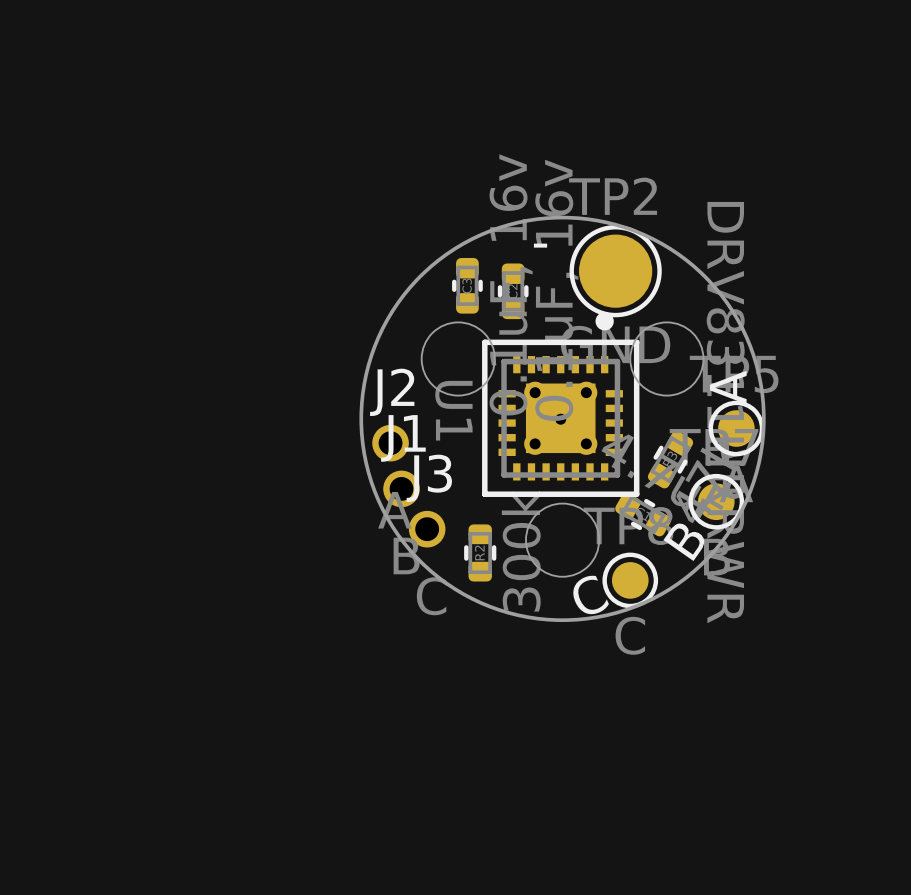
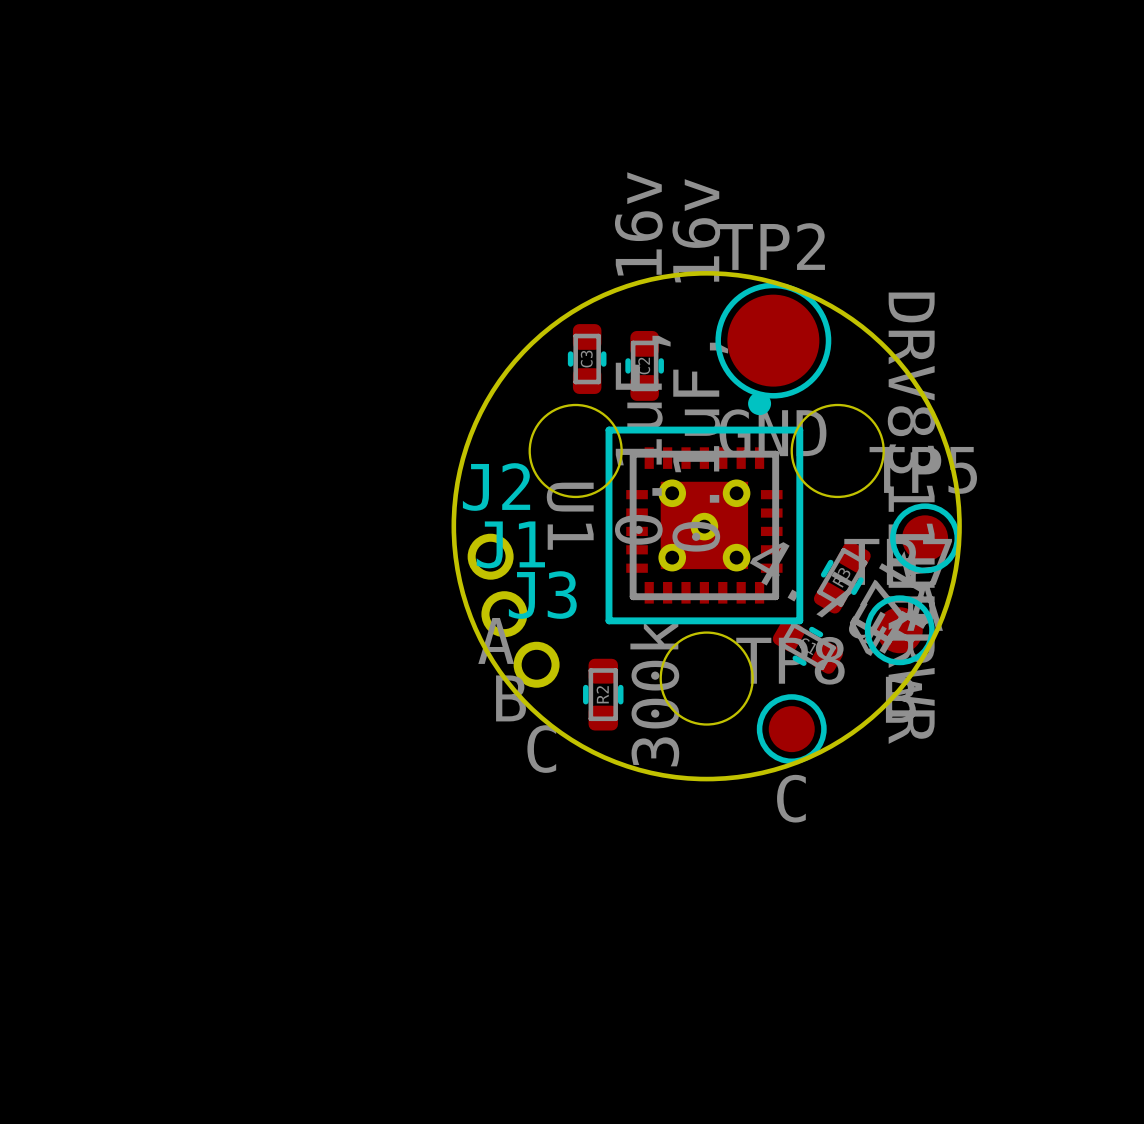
text: - (540, 245) -> none
text: A (728, 387) -> none
text: B (684, 541) -> none
text: C (590, 595) -> none

